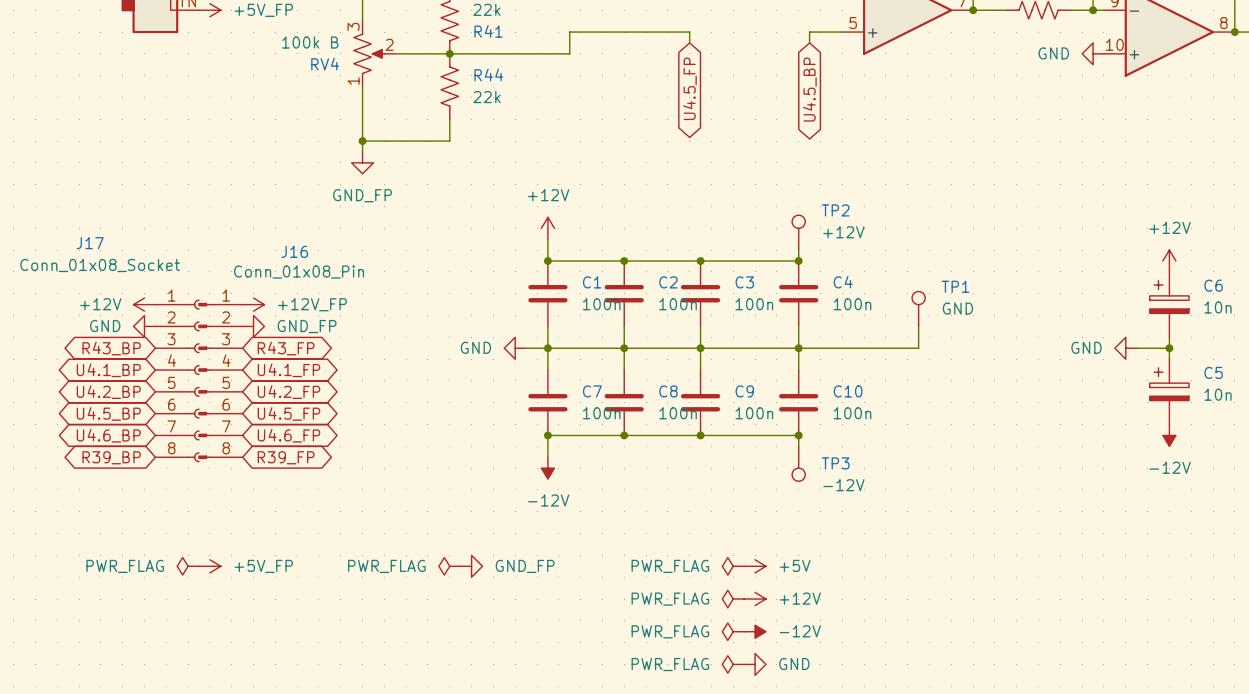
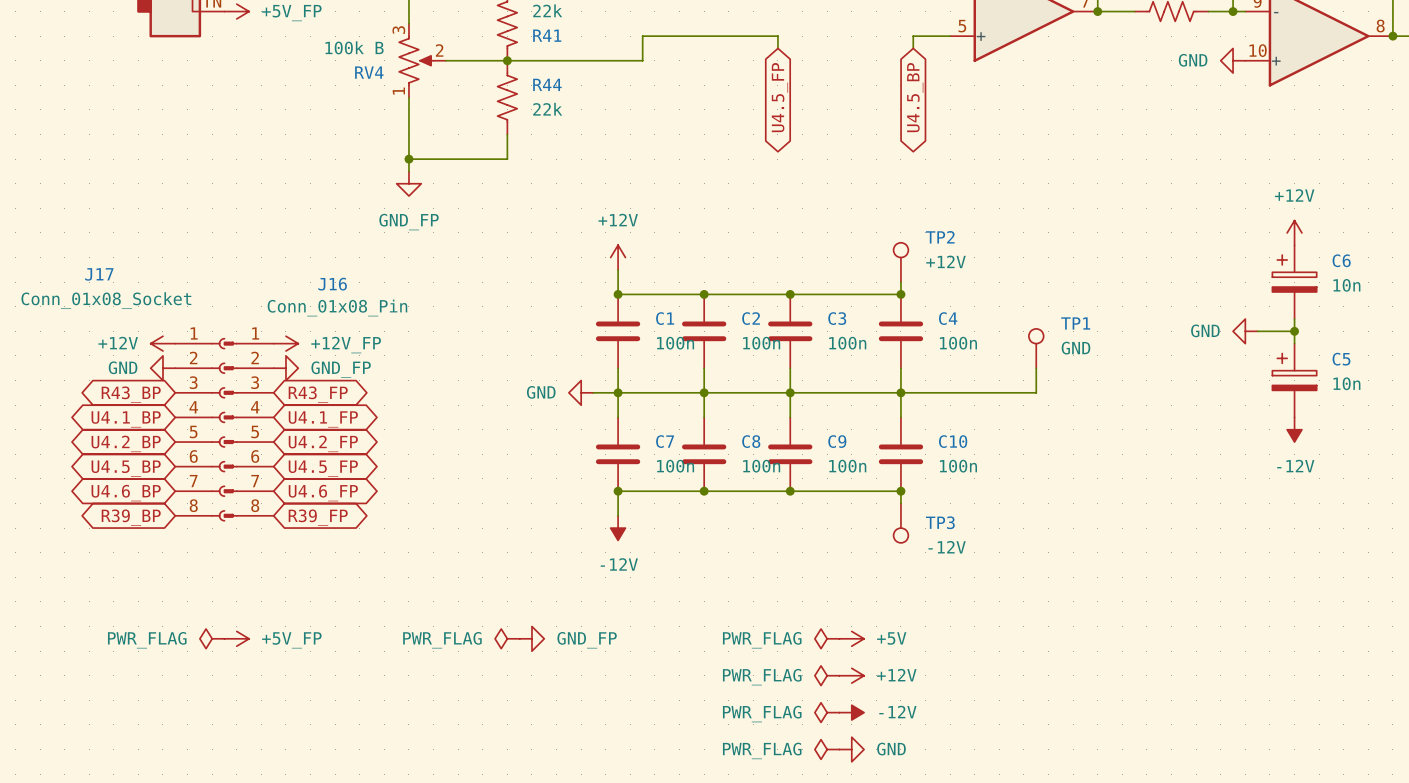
power symbol position: +12V (1169, 261) -> +12V (1294, 232)
junction: none -> (1294, 331)
C6 position: (1169, 304) -> (1294, 282)
wire: (1169, 337) (1169, 359) -> (1294, 319) (1294, 343)
power symbol position: GND (1125, 348) -> GND (1245, 331)
wire: (1136, 348) (1169, 348) -> (1257, 331) (1294, 331)
junction: (1169, 348) -> none
C5 position: (1169, 391) -> (1294, 380)
power symbol position: -12V (1169, 435) -> -12V (1294, 429)

